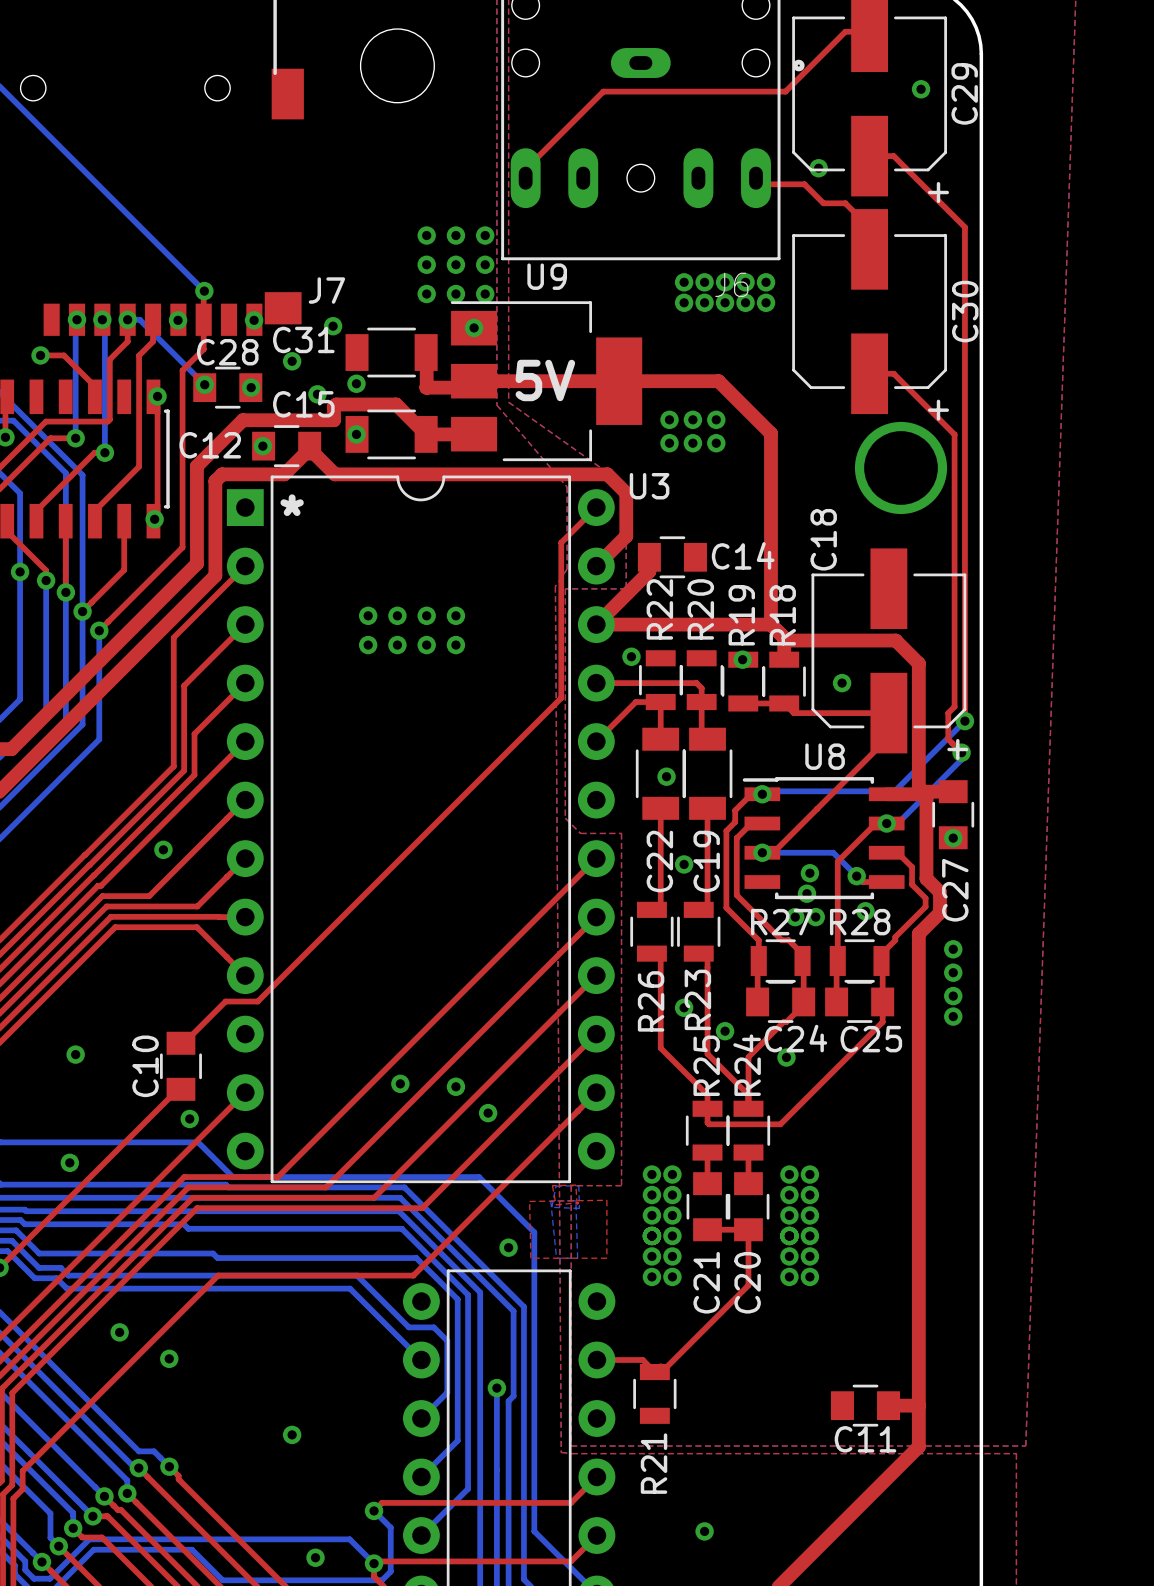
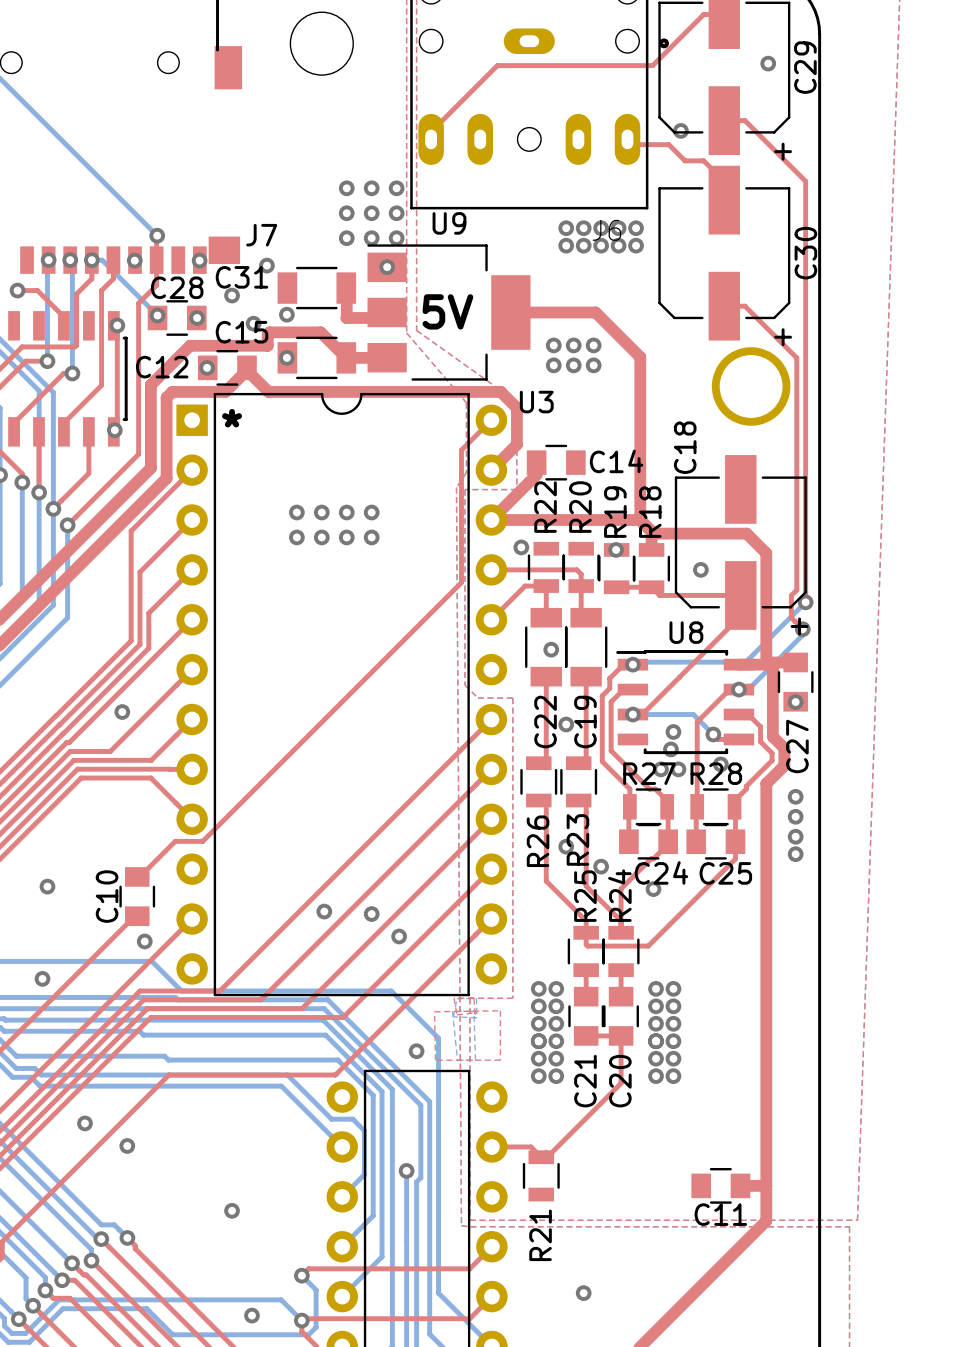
top track: (474, 381) (619, 381) -> none

